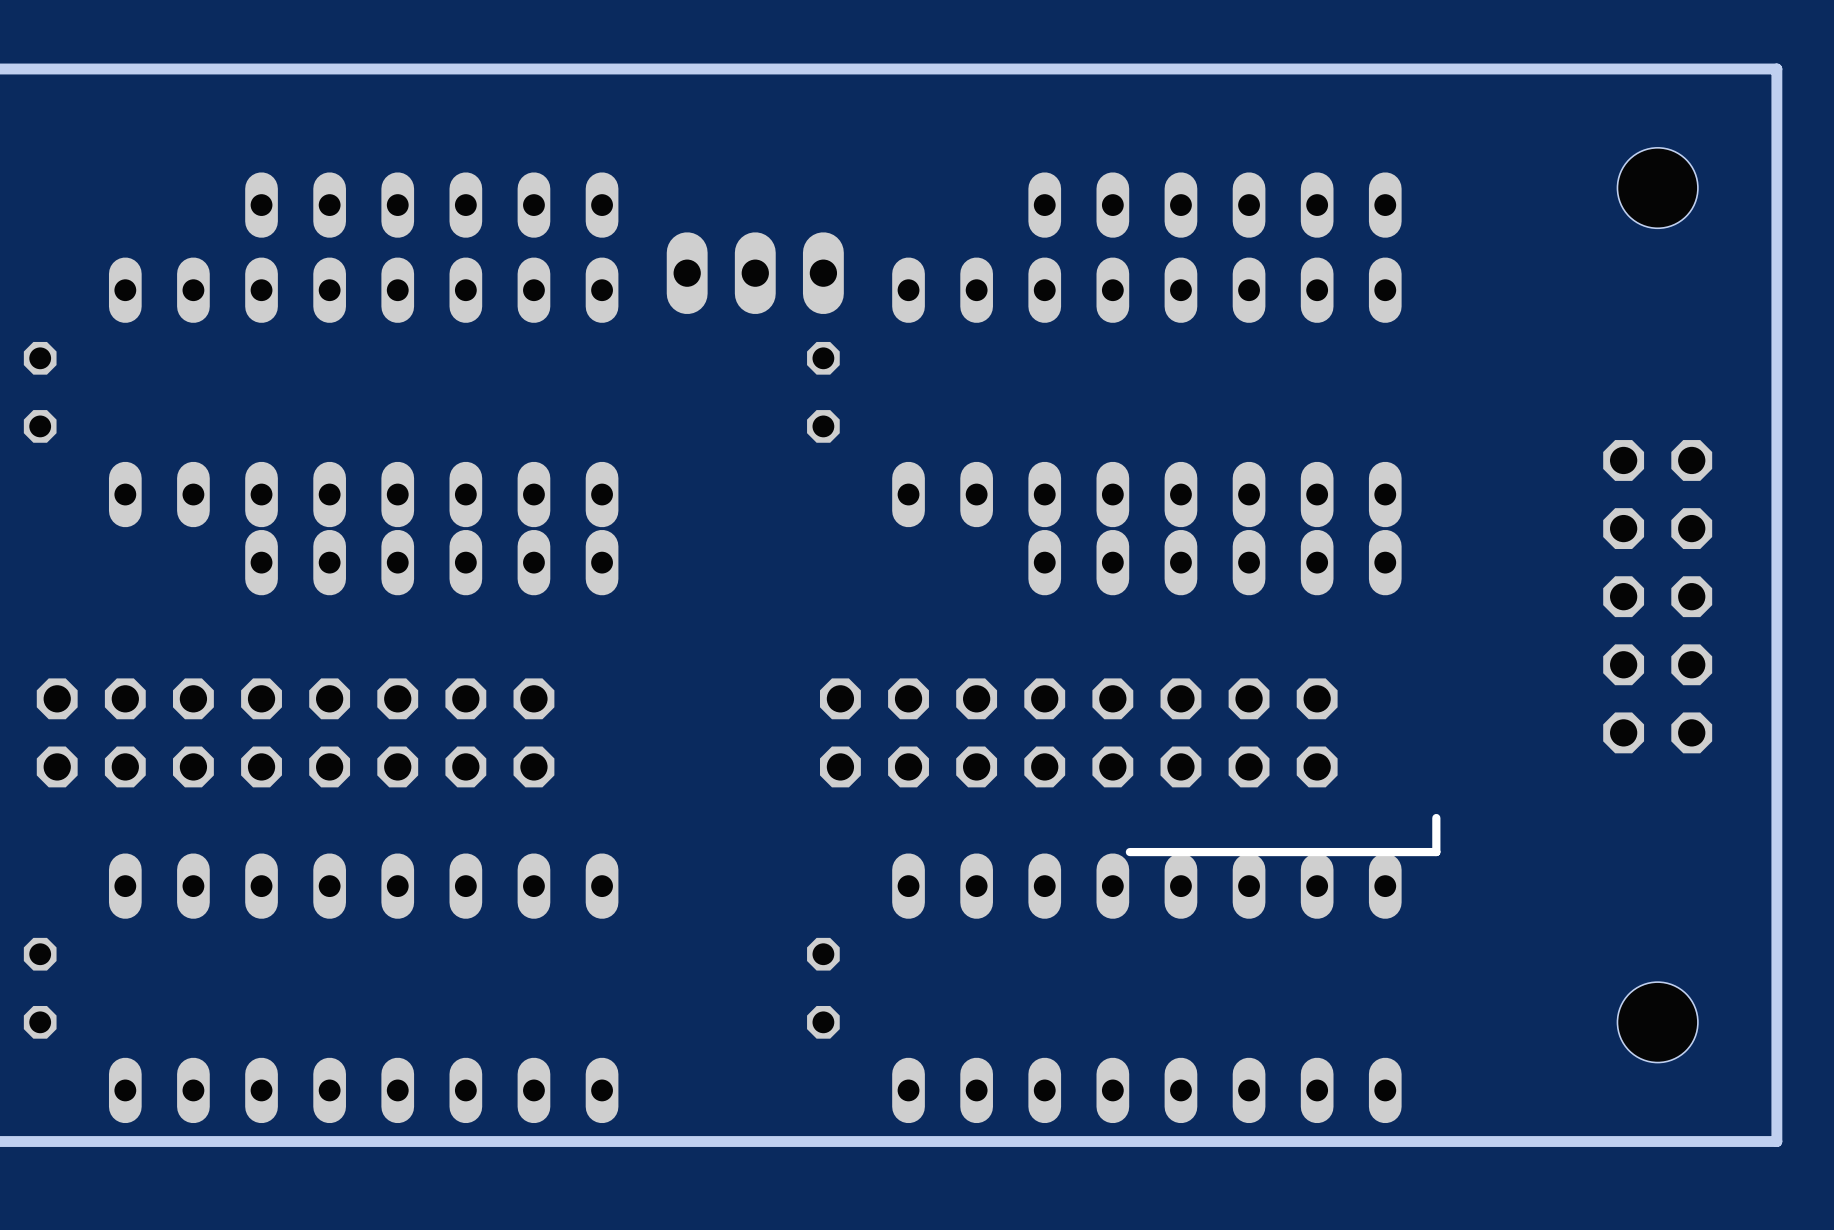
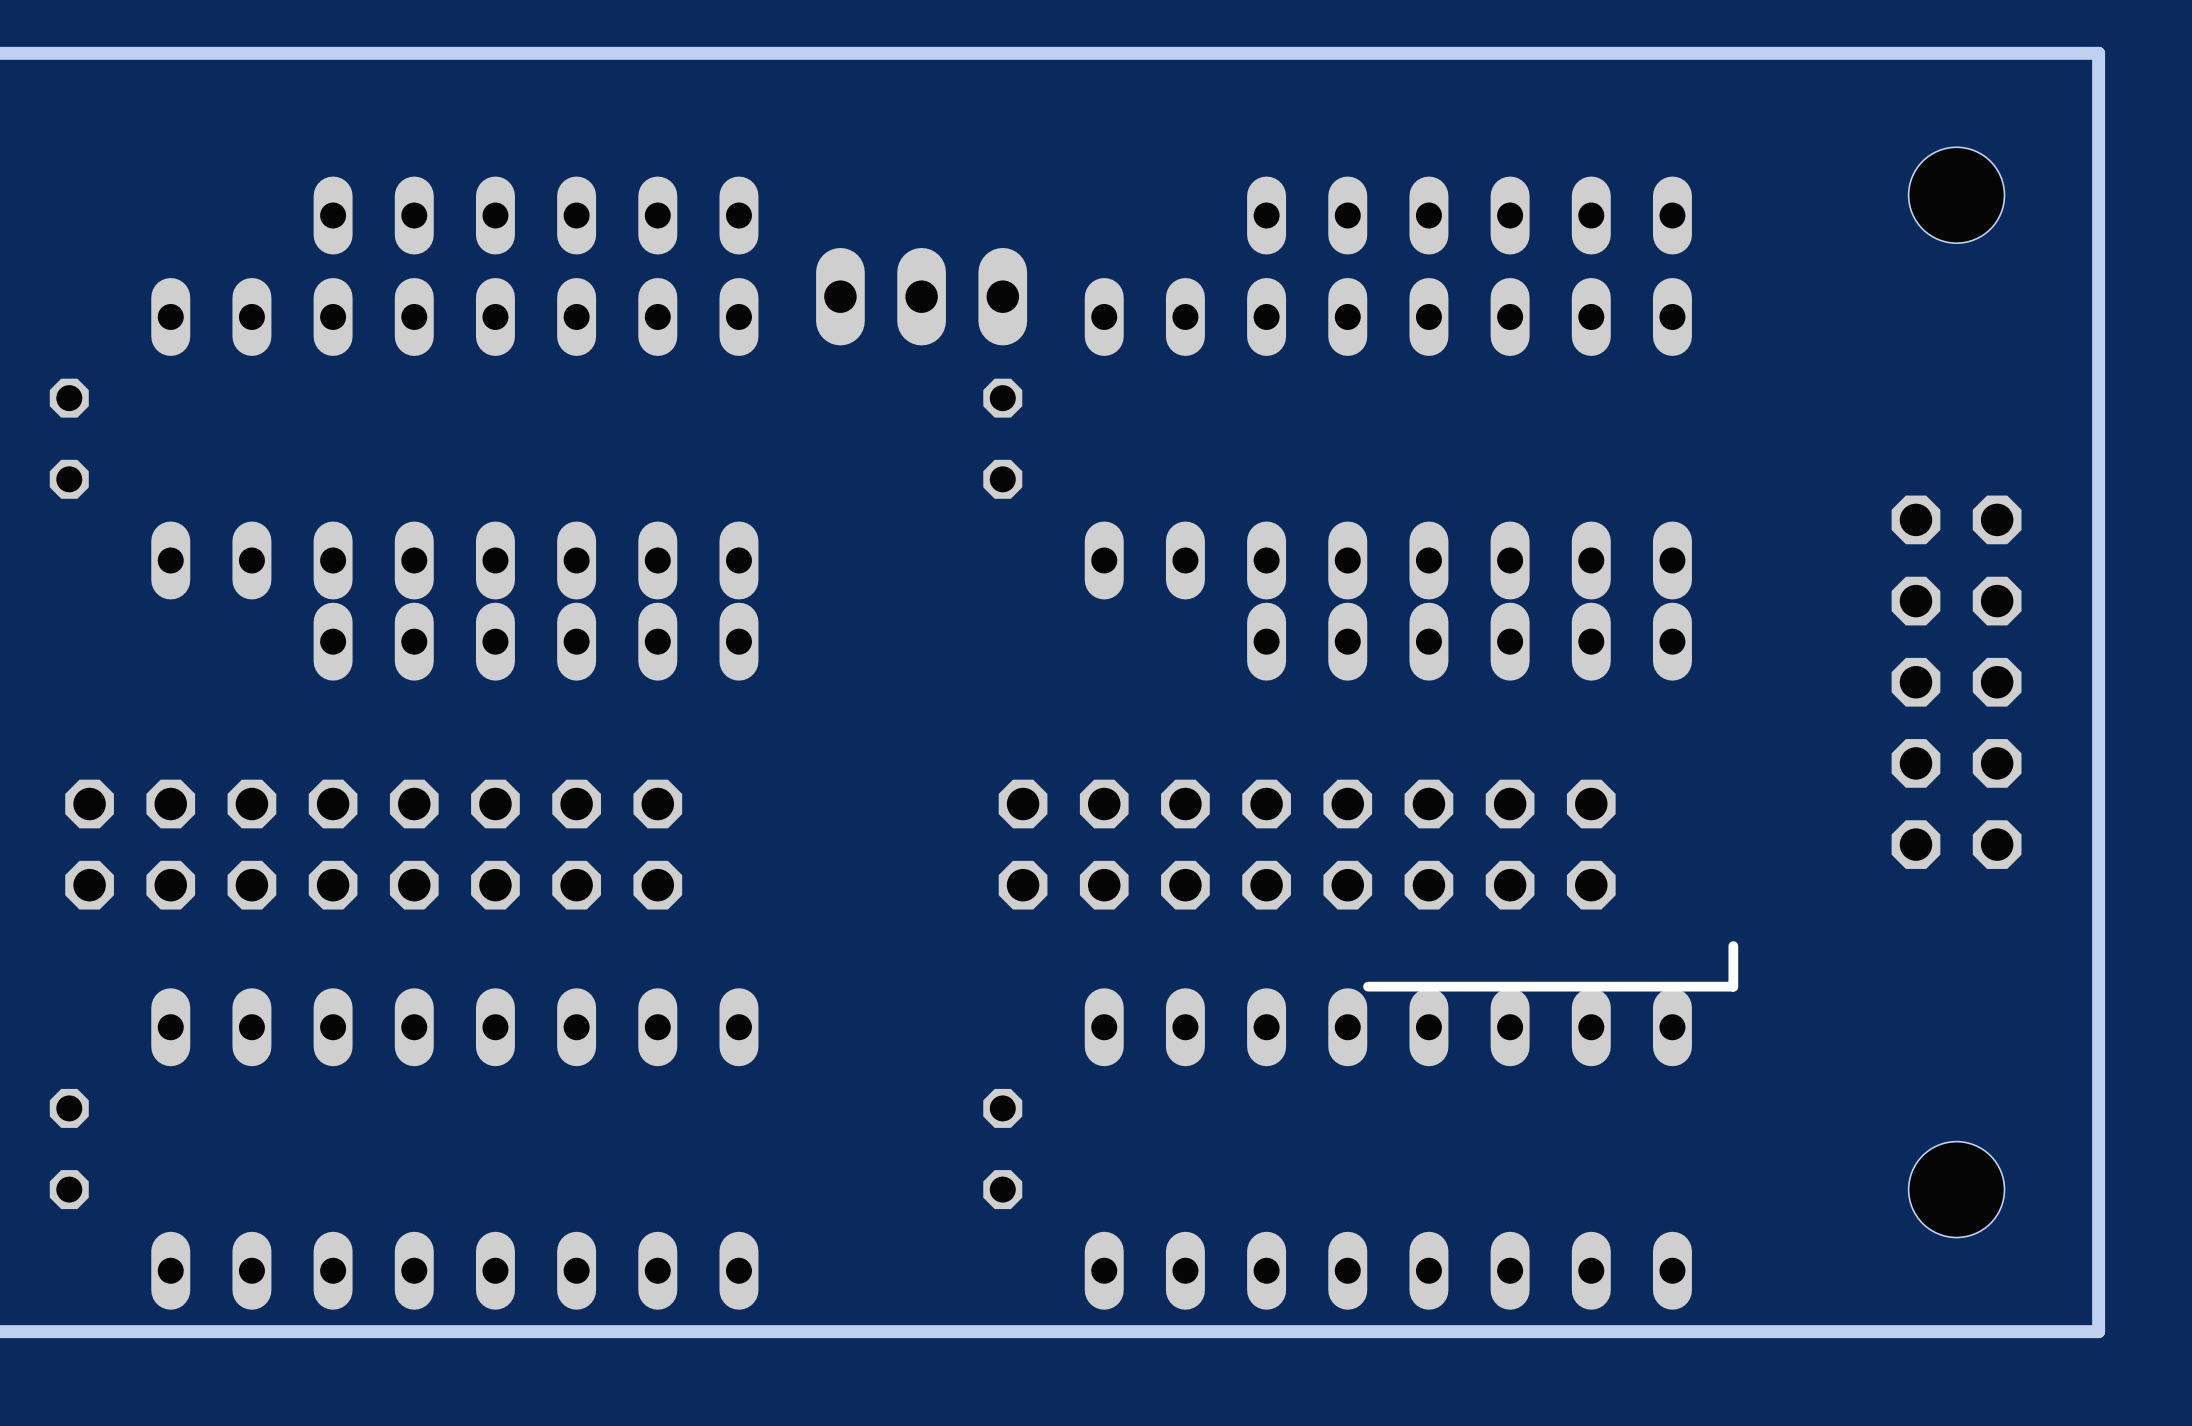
board edge: (1742, 69) (1776, 69) (1776, 1141) (1742, 1141) -> (2098, 53) (2098, 1331)
part position: (1657, 188) -> (1956, 195)
part position: (1657, 596) -> (1956, 682)
part position: (1657, 1022) -> (1956, 1189)

